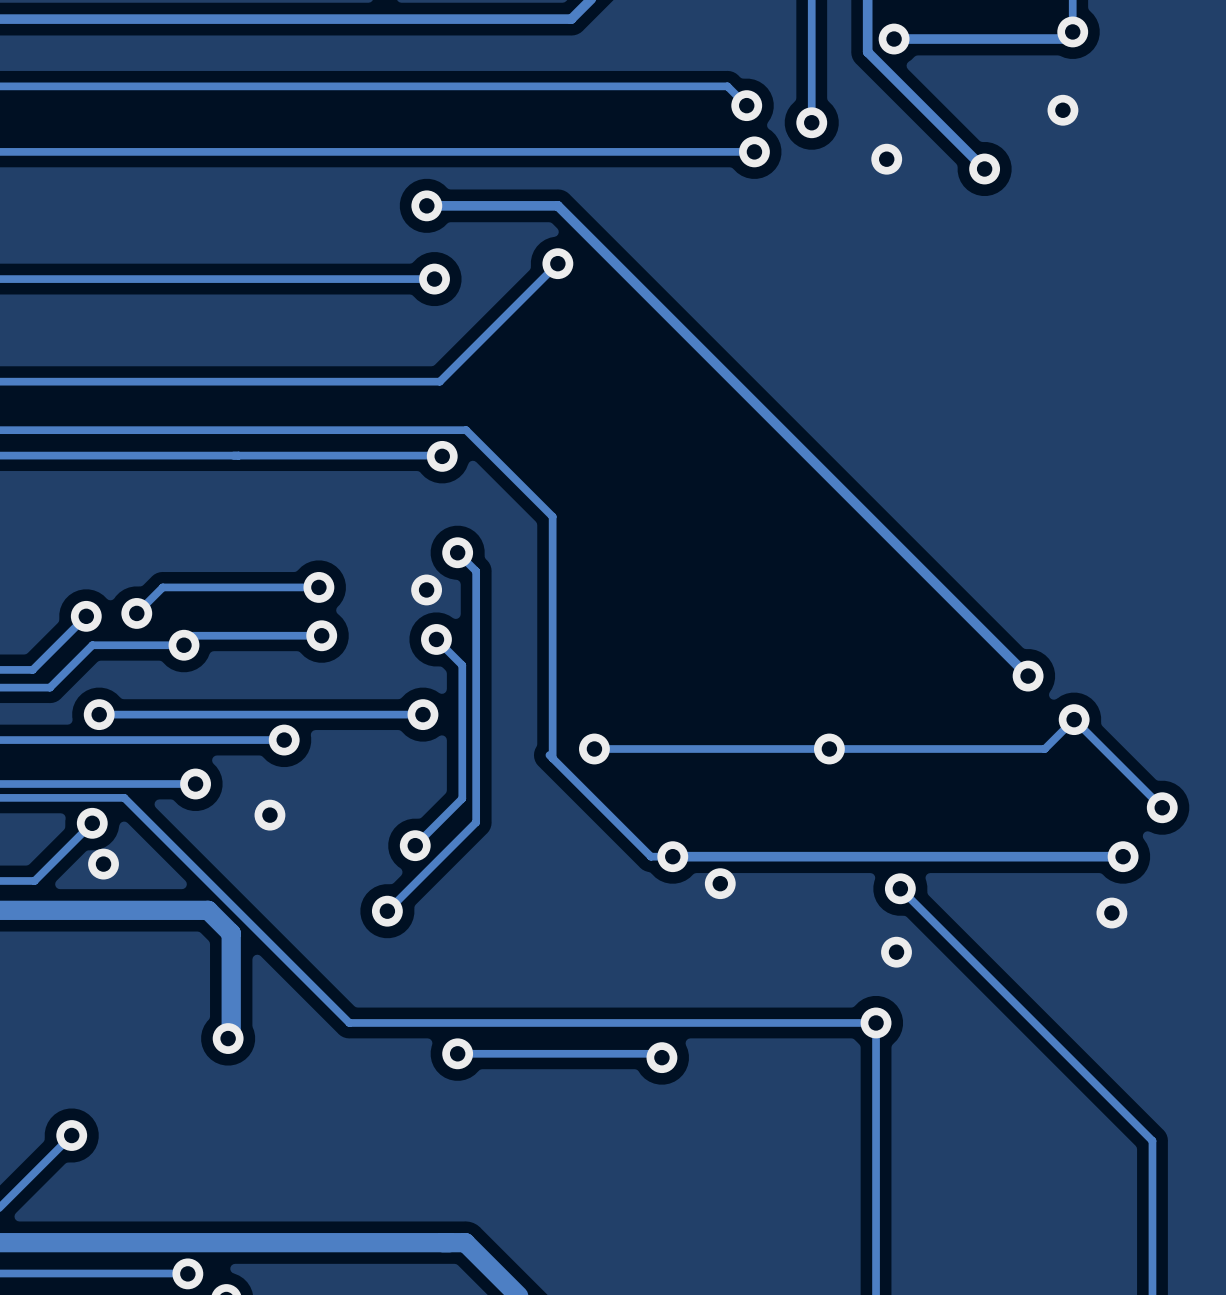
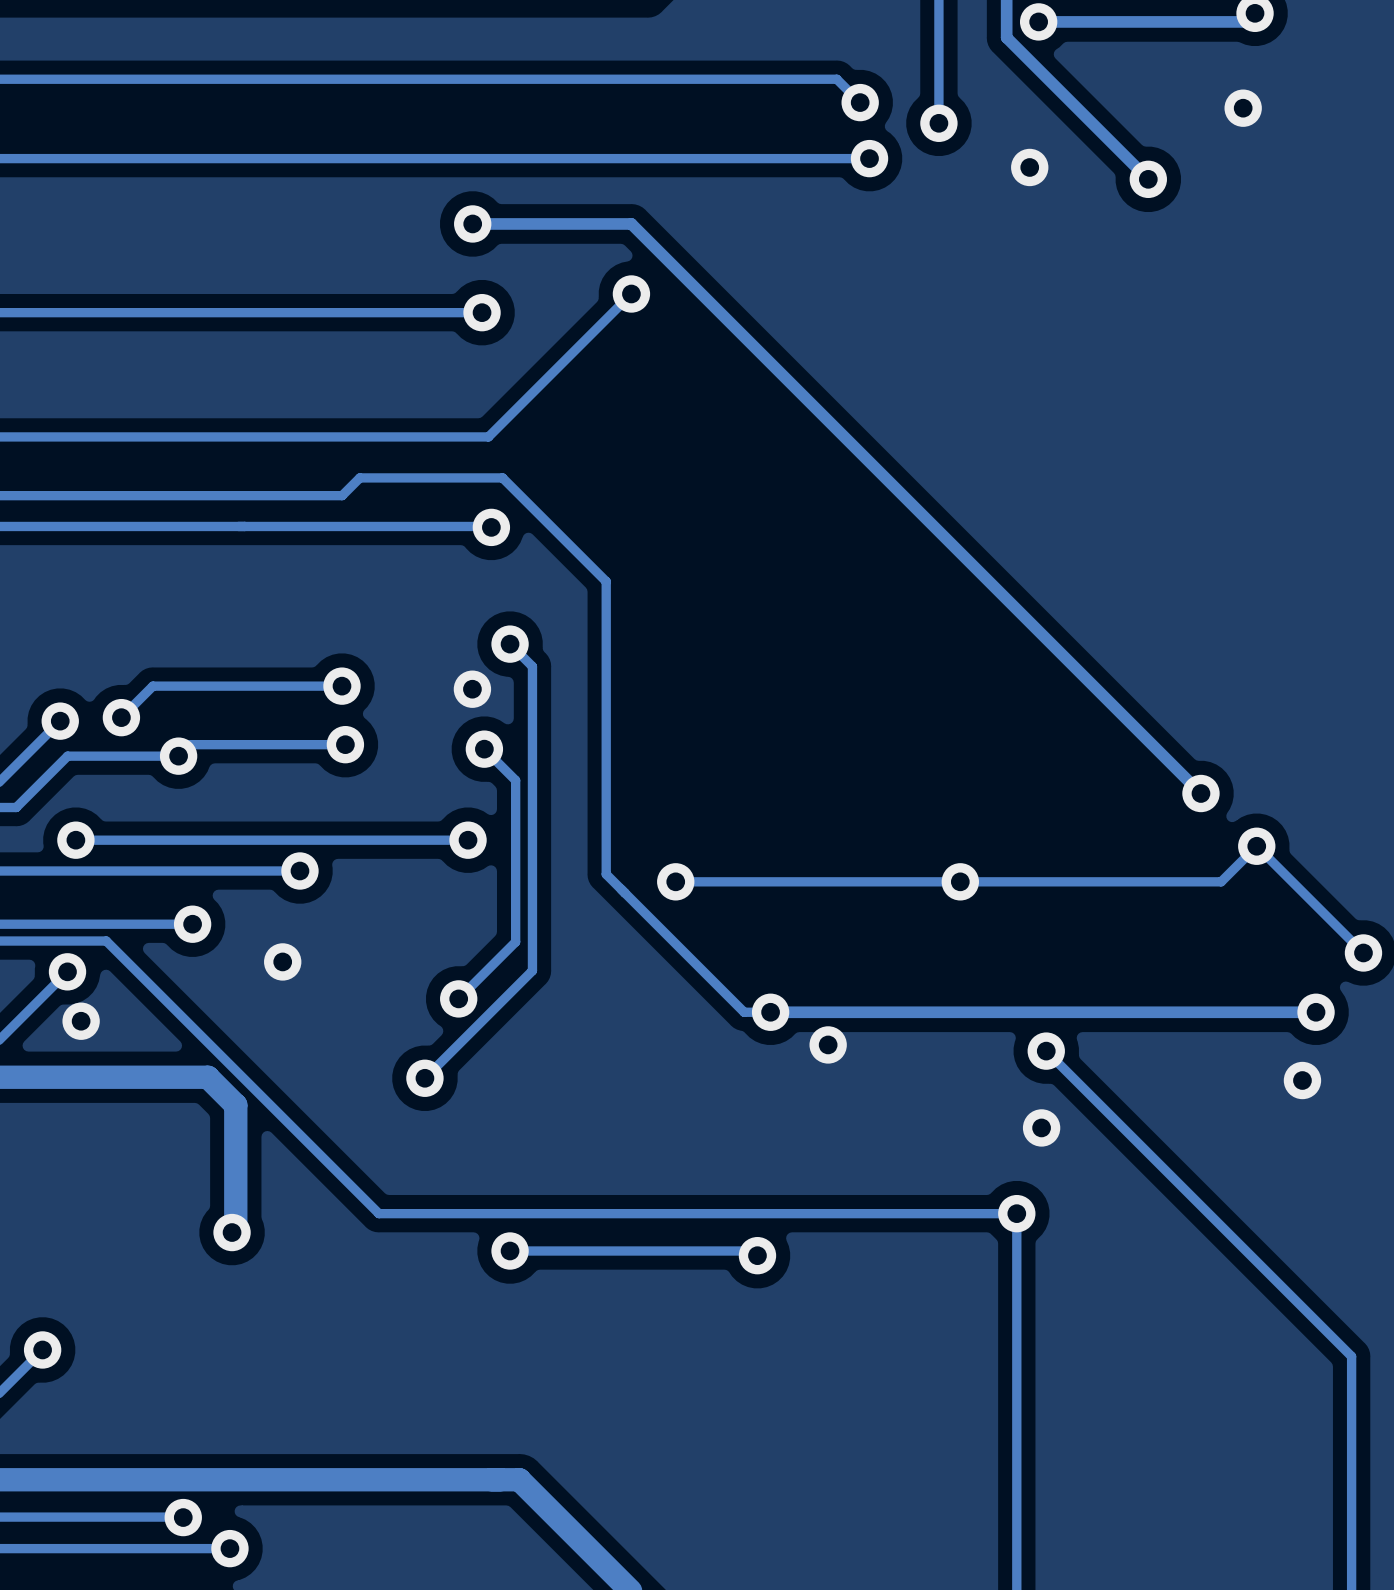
track: (466, 430) (319, 430) -> (520, 495) (502, 477) (359, 477) (342, 495)
track: (537, 501) (552, 516) (552, 758) -> (606, 581) (606, 874) (621, 889)

